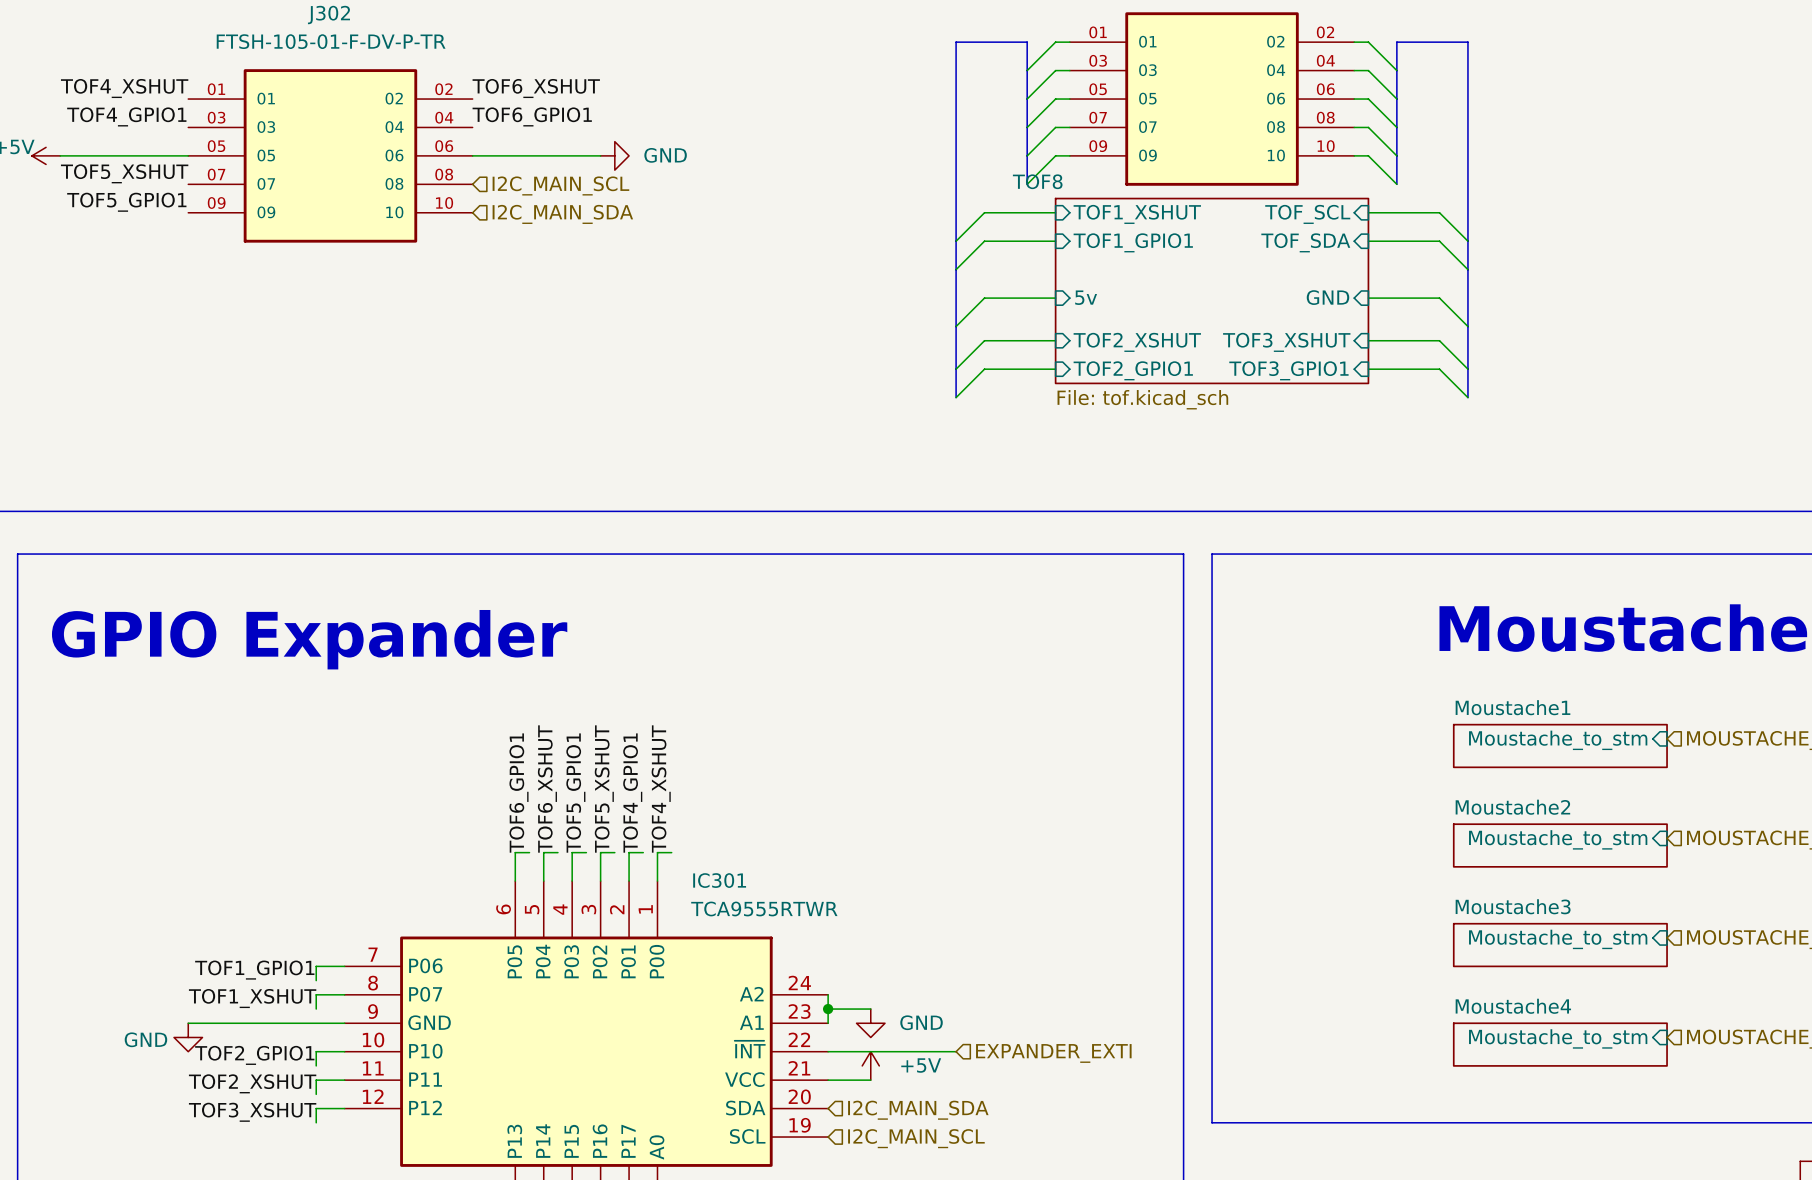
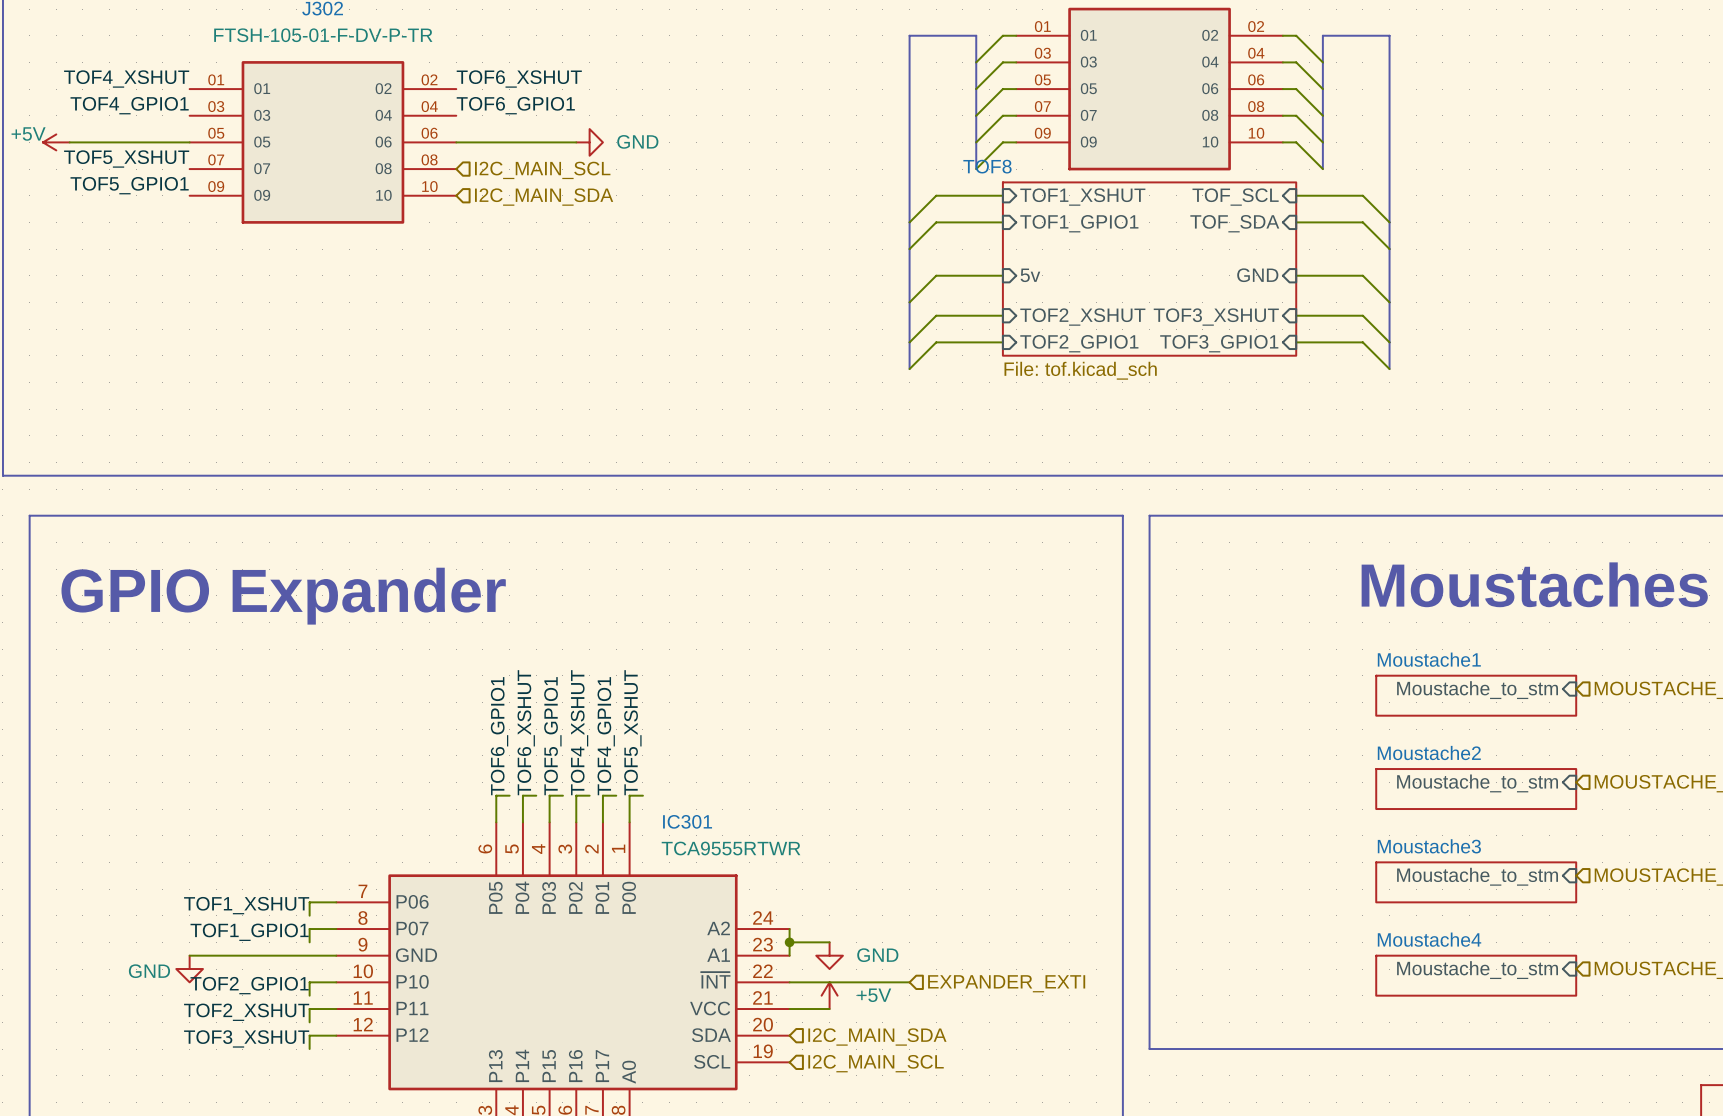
label: TOF5_XSHUT (604, 789) -> TOF4_XSHUT (579, 732)
label: TOF4_XSHUT (661, 789) -> TOF5_XSHUT (632, 732)
label: TOF1_GPIO1 (254, 970) -> TOF1_XSHUT (246, 905)
label: TOF1_XSHUT (252, 998) -> TOF1_GPIO1 (249, 932)

